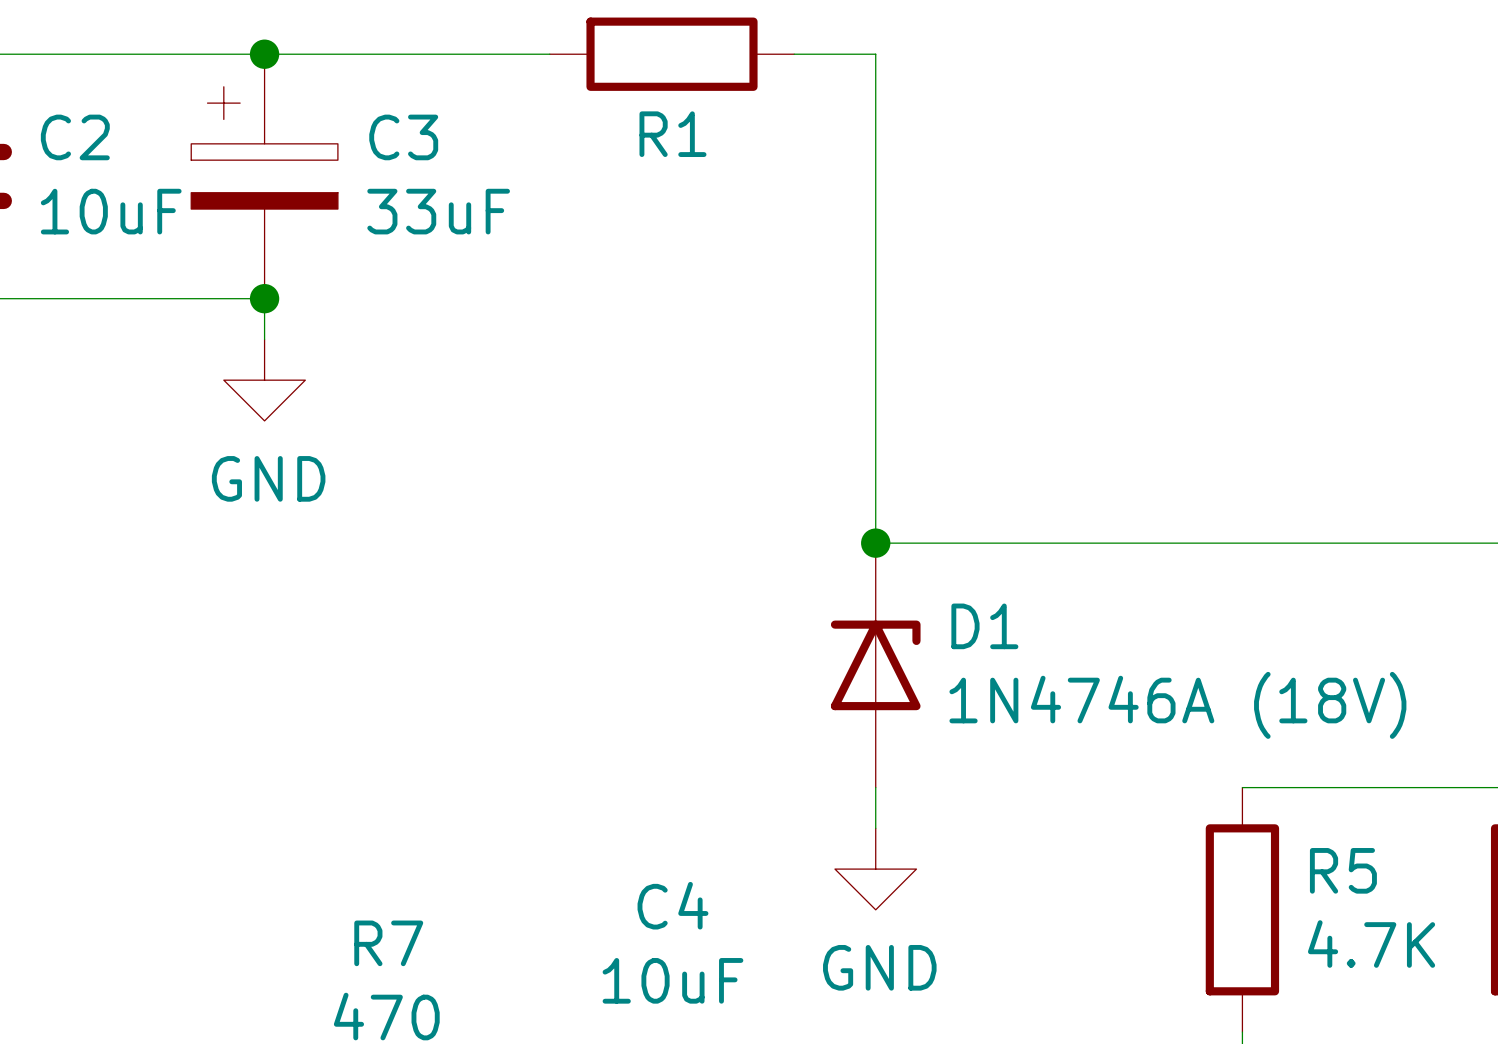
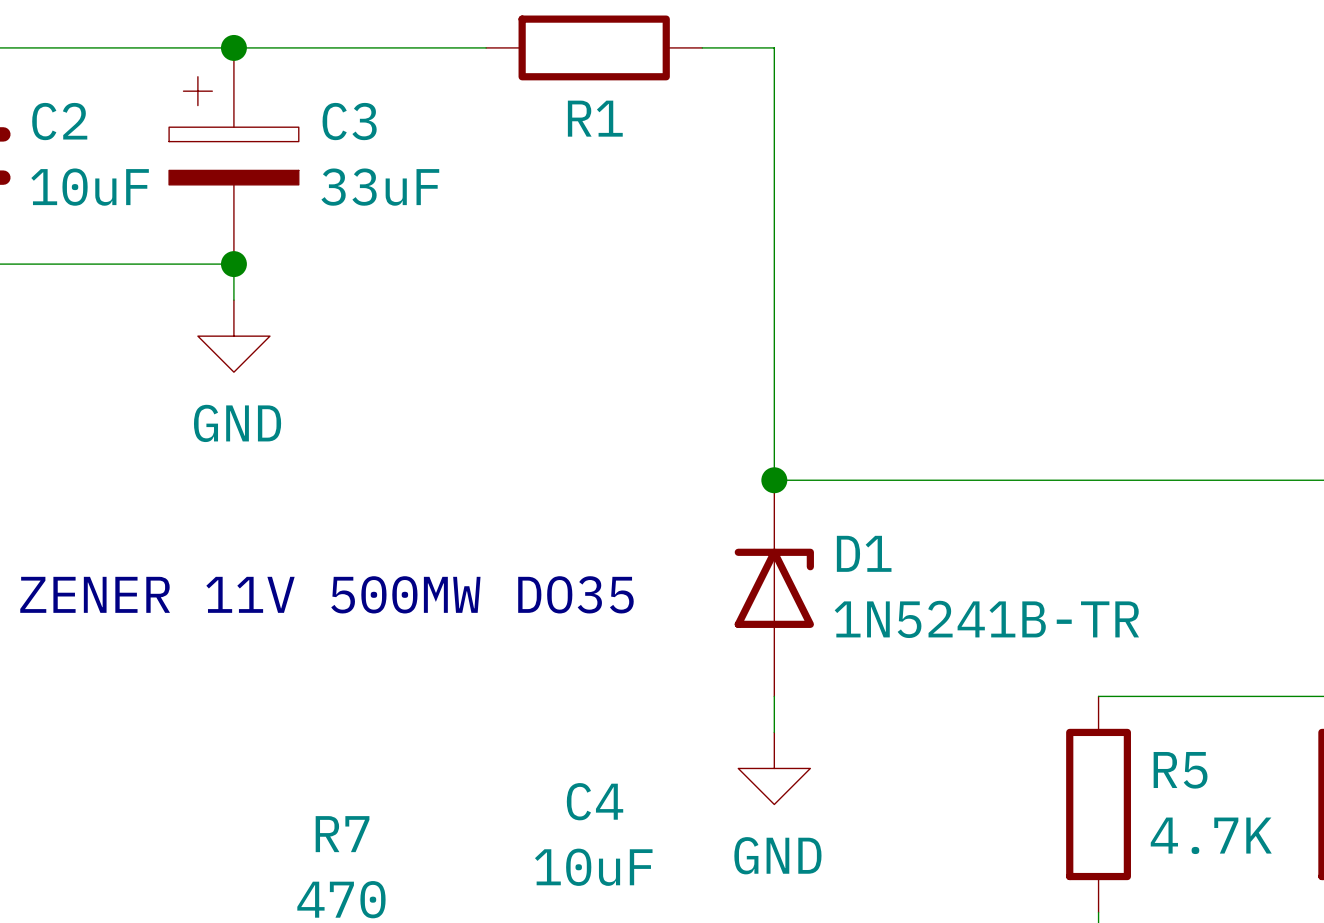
text: none -> ZENER 11V 500MW DO35 (326, 594)
D1 value: 1N4746A (18V) (1177, 705) -> 1N5241B-TR (986, 619)

